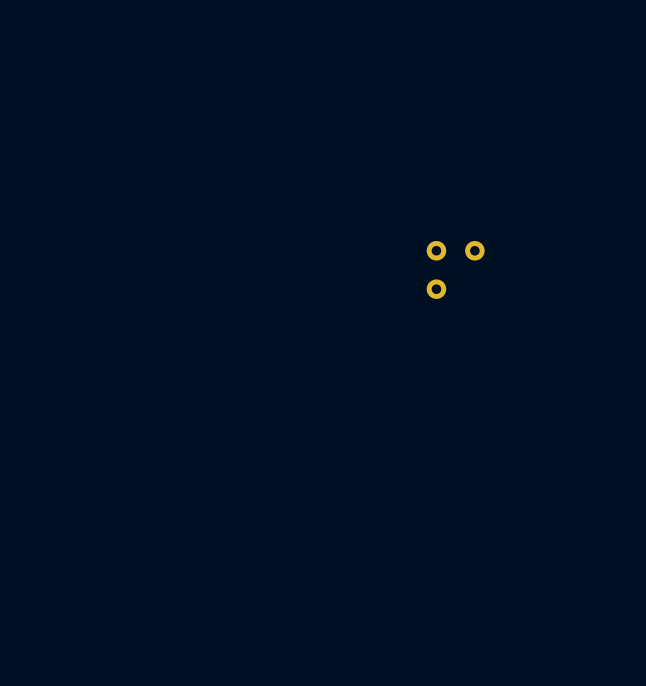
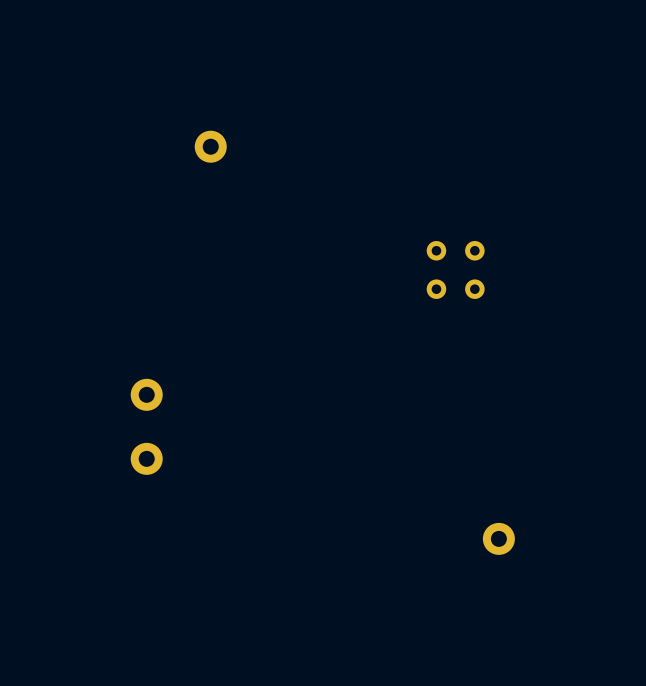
part: none -> (210, 146)
part footprint: [426, 241, 485, 299] -> [426, 241, 485, 299]
part: none -> (146, 394)
part: none -> (146, 458)
part: none -> (498, 538)

